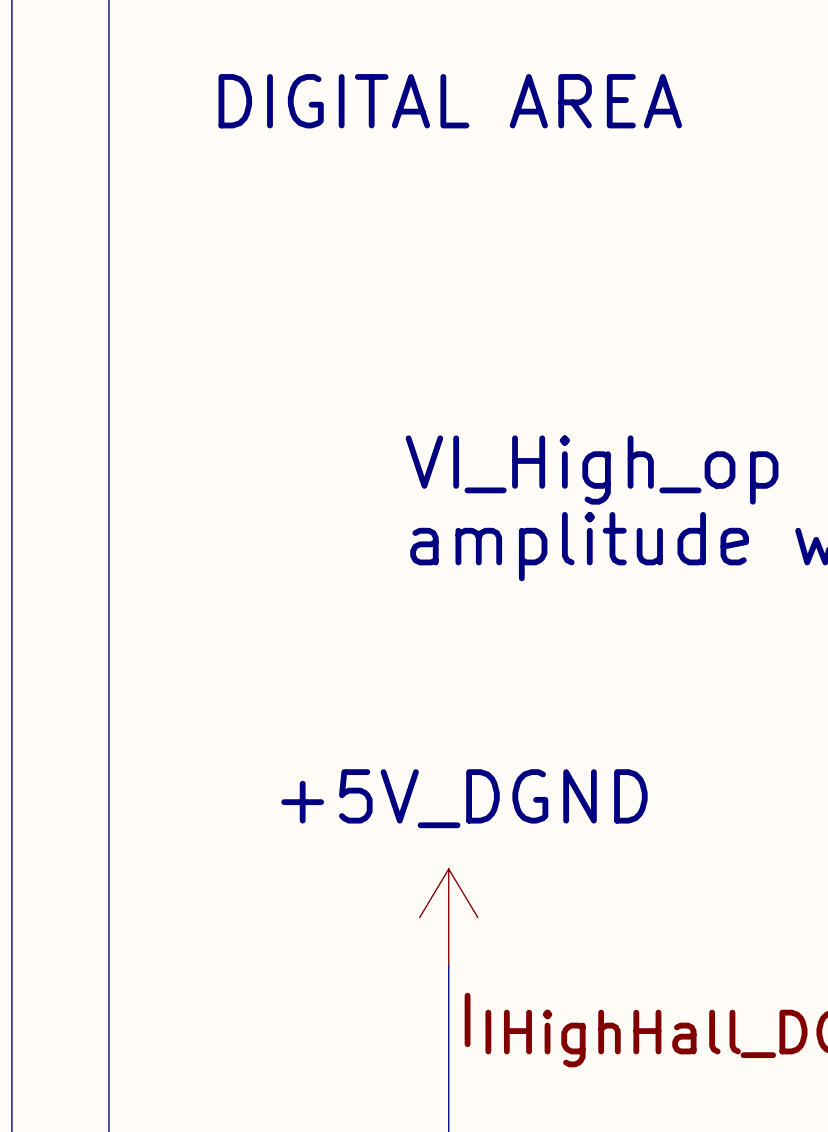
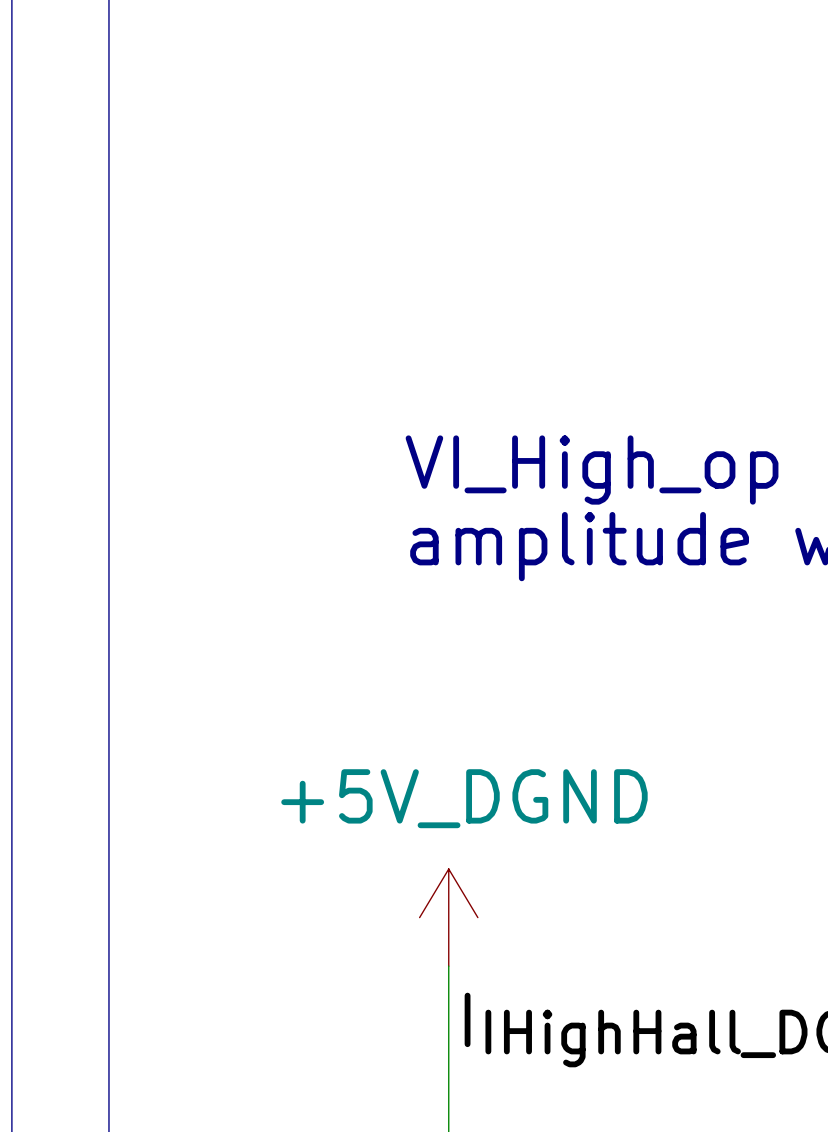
text: DIGITAL AREA (450, 101) -> none

